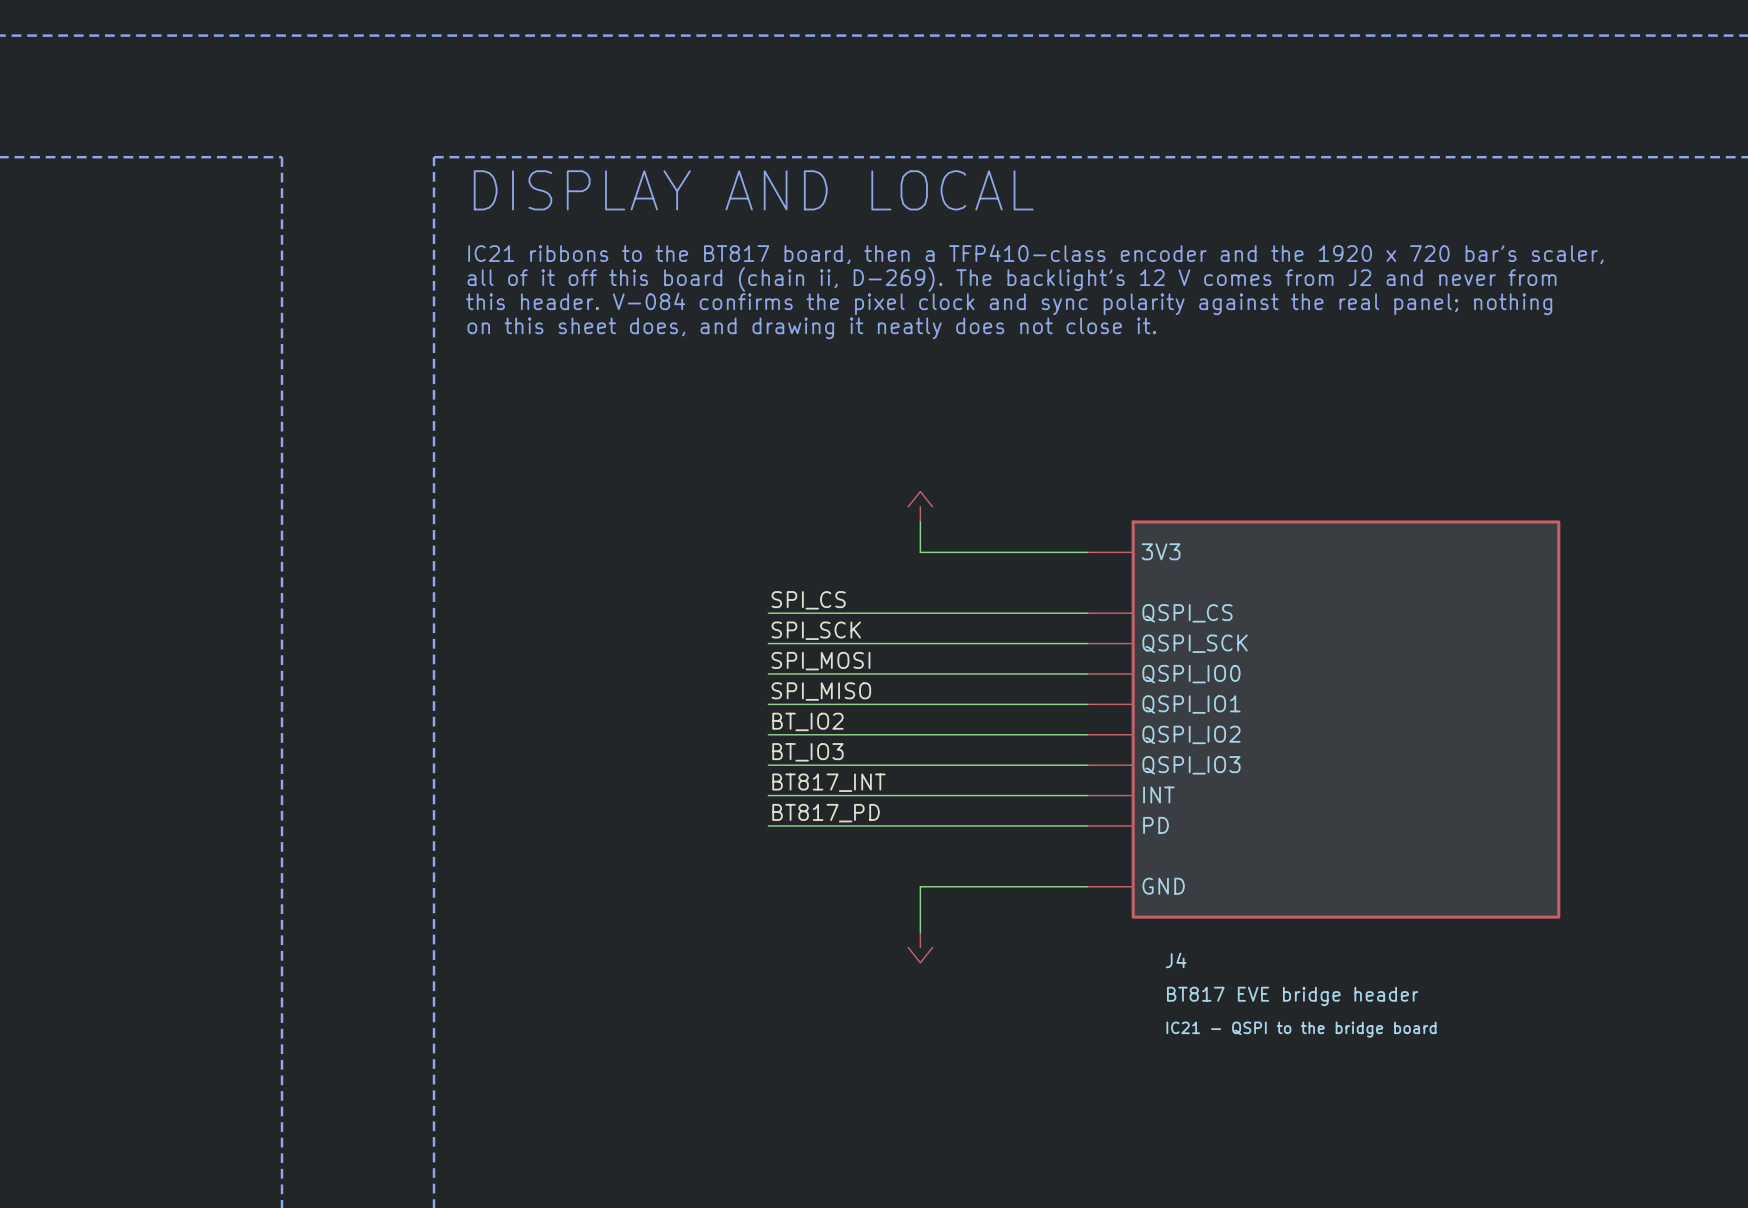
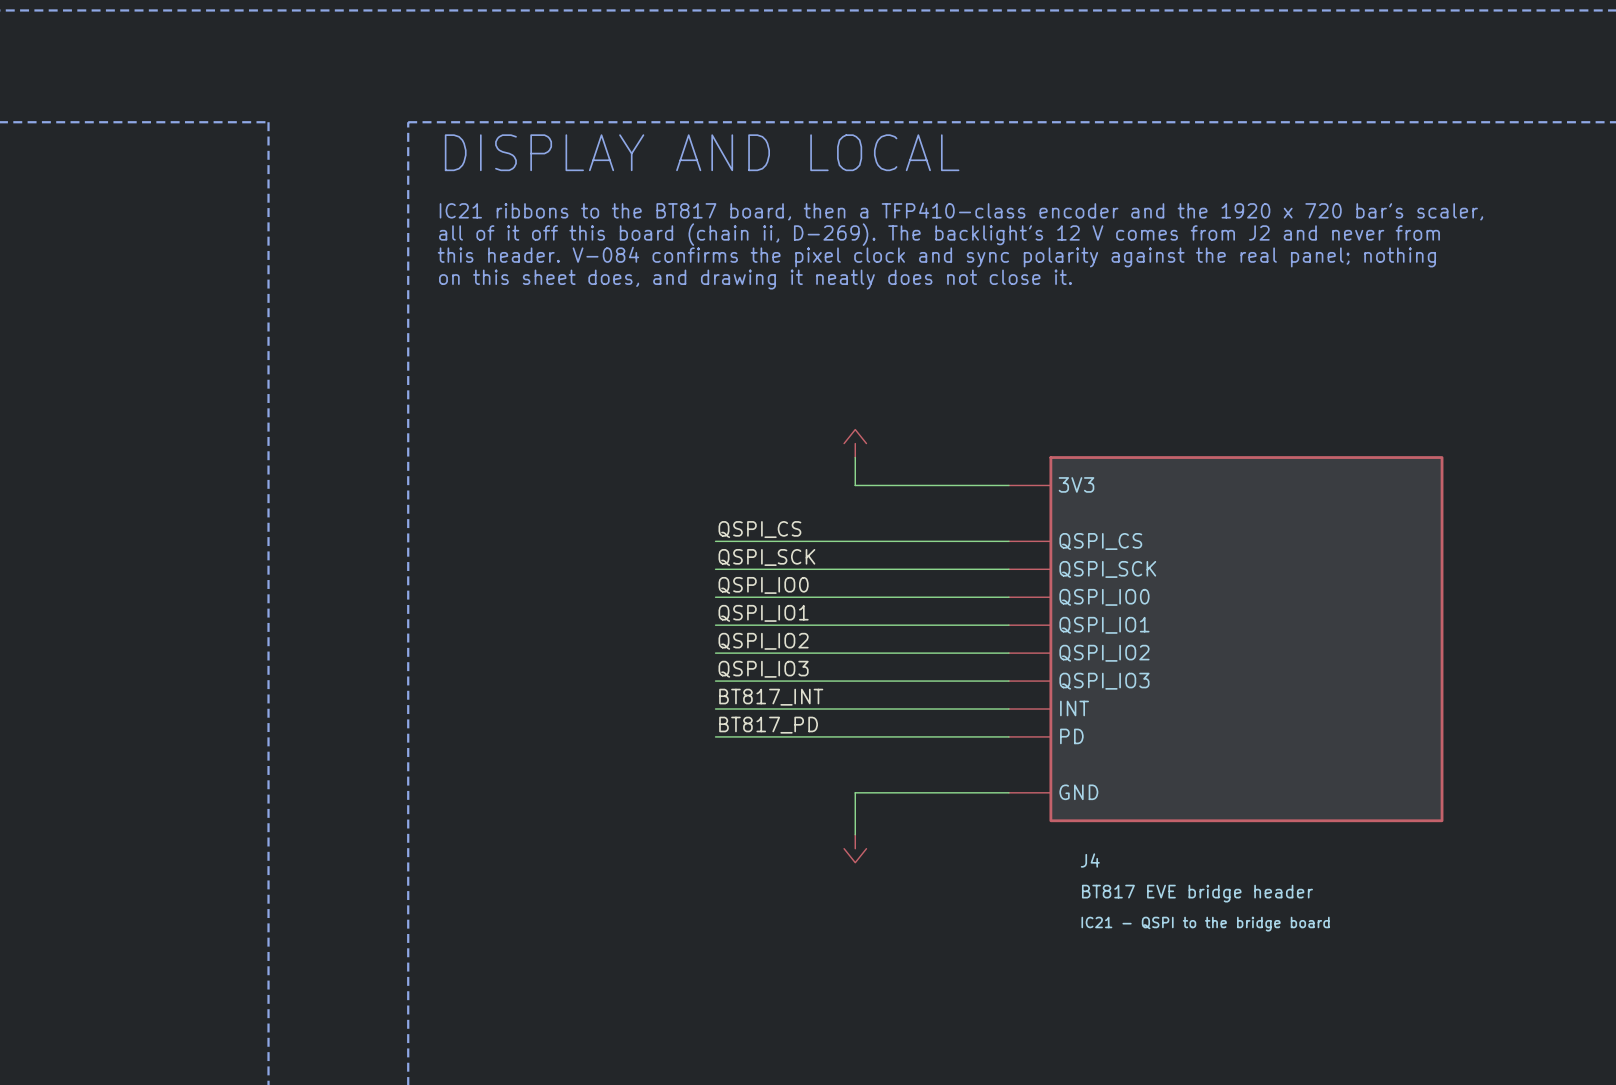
label: SPI_CS (808, 600) -> QSPI_CS (759, 529)
label: SPI_SCK (816, 630) -> QSPI_SCK (766, 557)
label: SPI_MOSI (820, 661) -> QSPI_IO0 (763, 585)
label: SPI_MISO (821, 691) -> QSPI_IO1 (763, 613)
label: BT_IO2 (807, 721) -> QSPI_IO2 (763, 641)
label: BT_IO3 (807, 752) -> QSPI_IO3 (763, 669)

